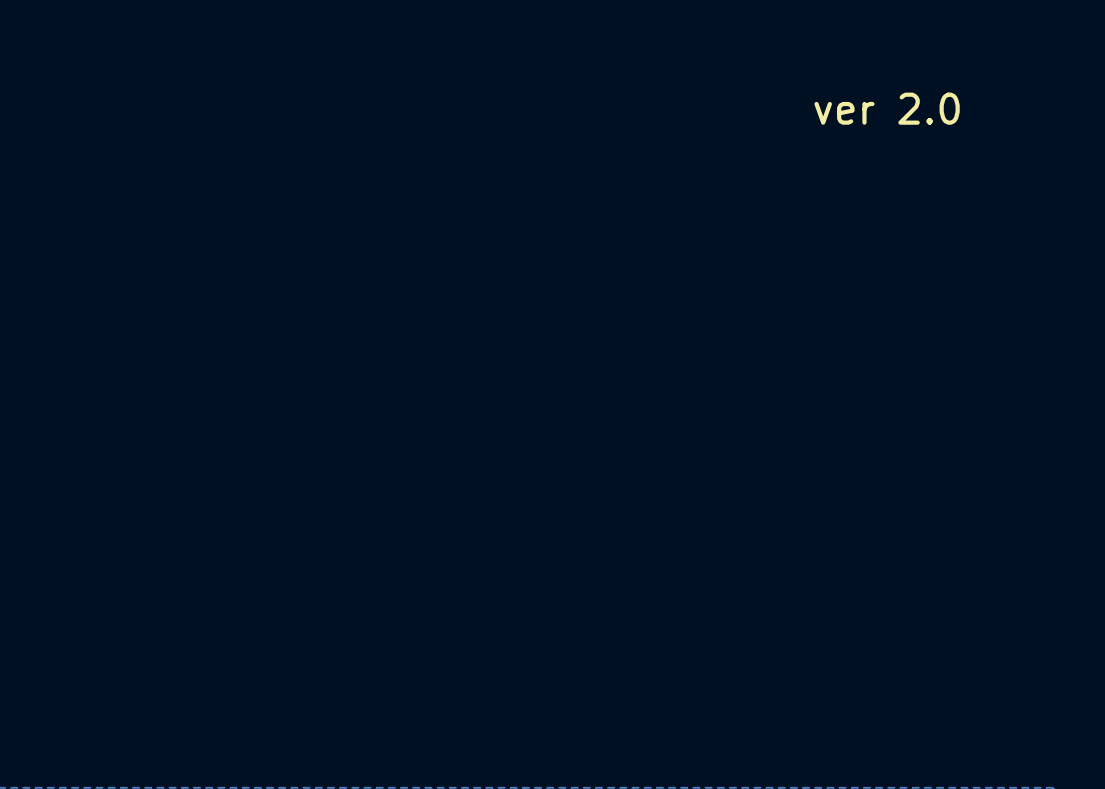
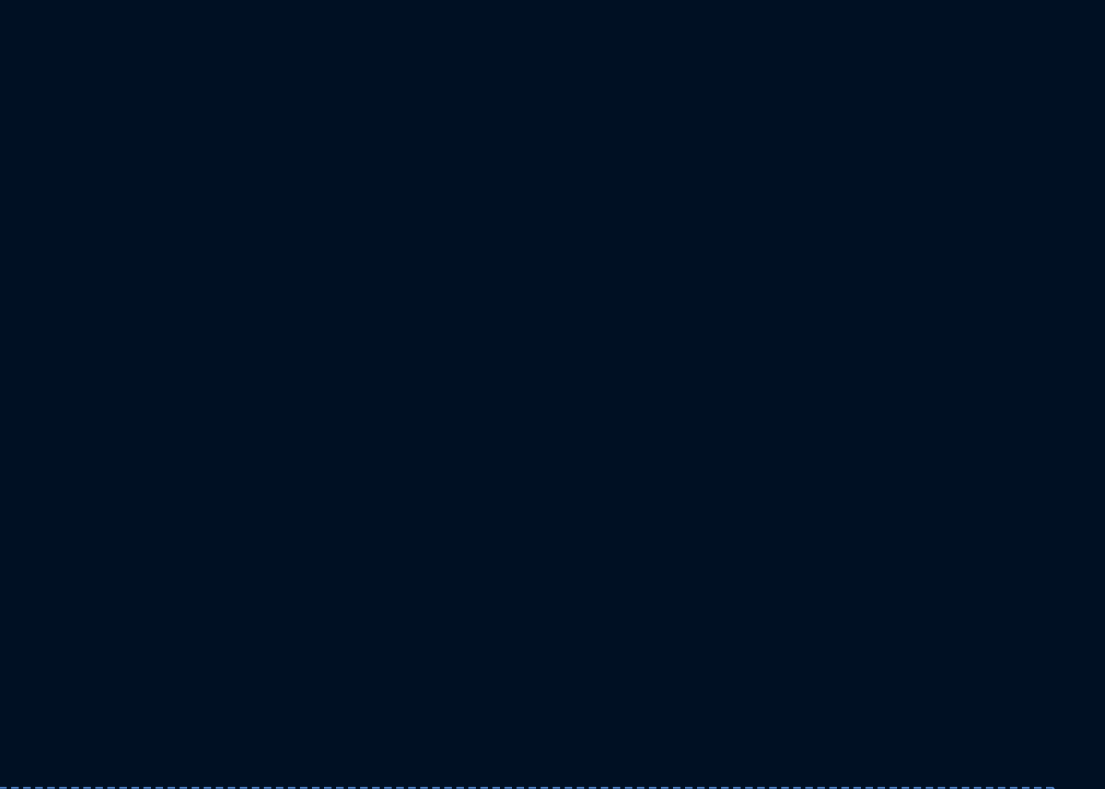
text: ver 2.0 (887, 108) -> none

